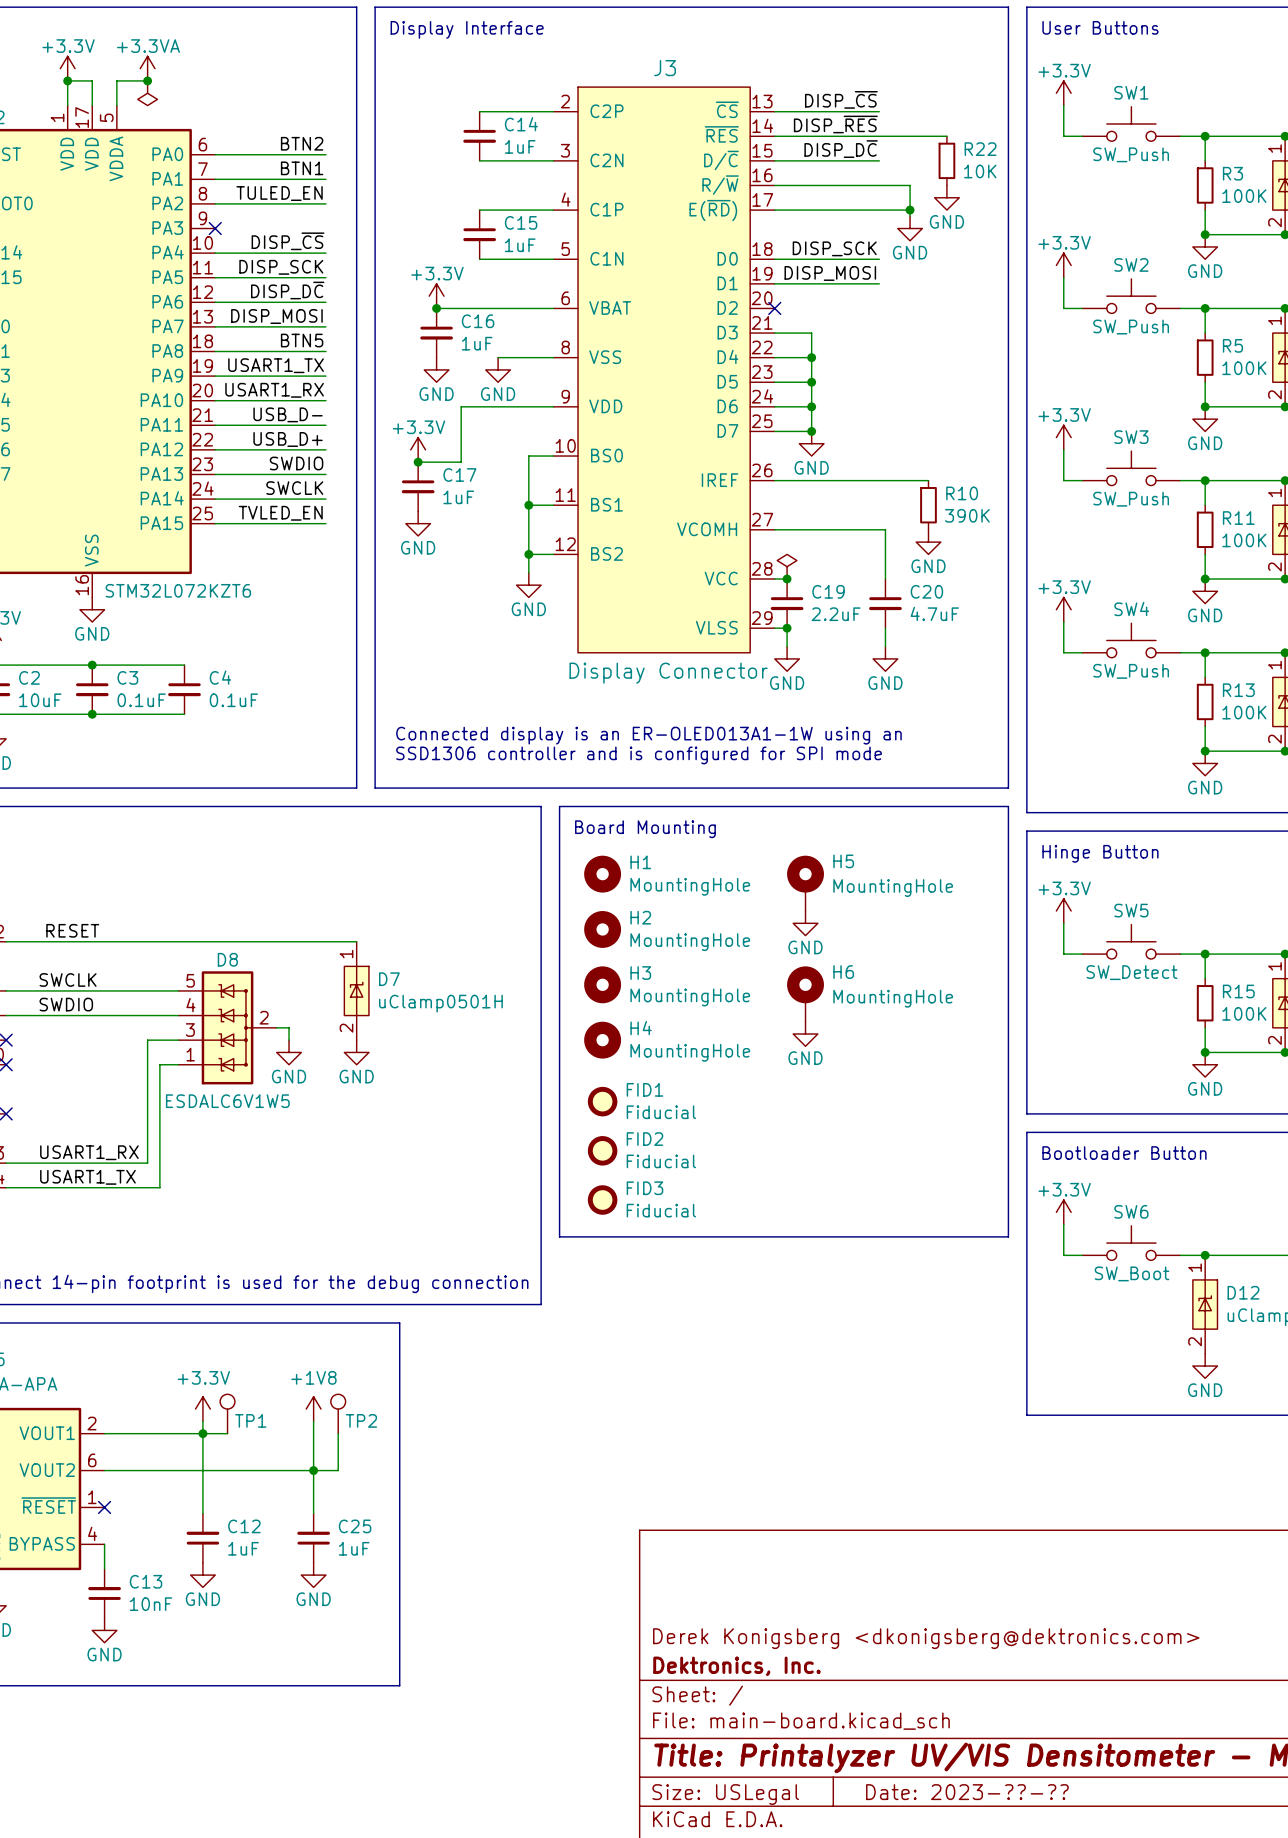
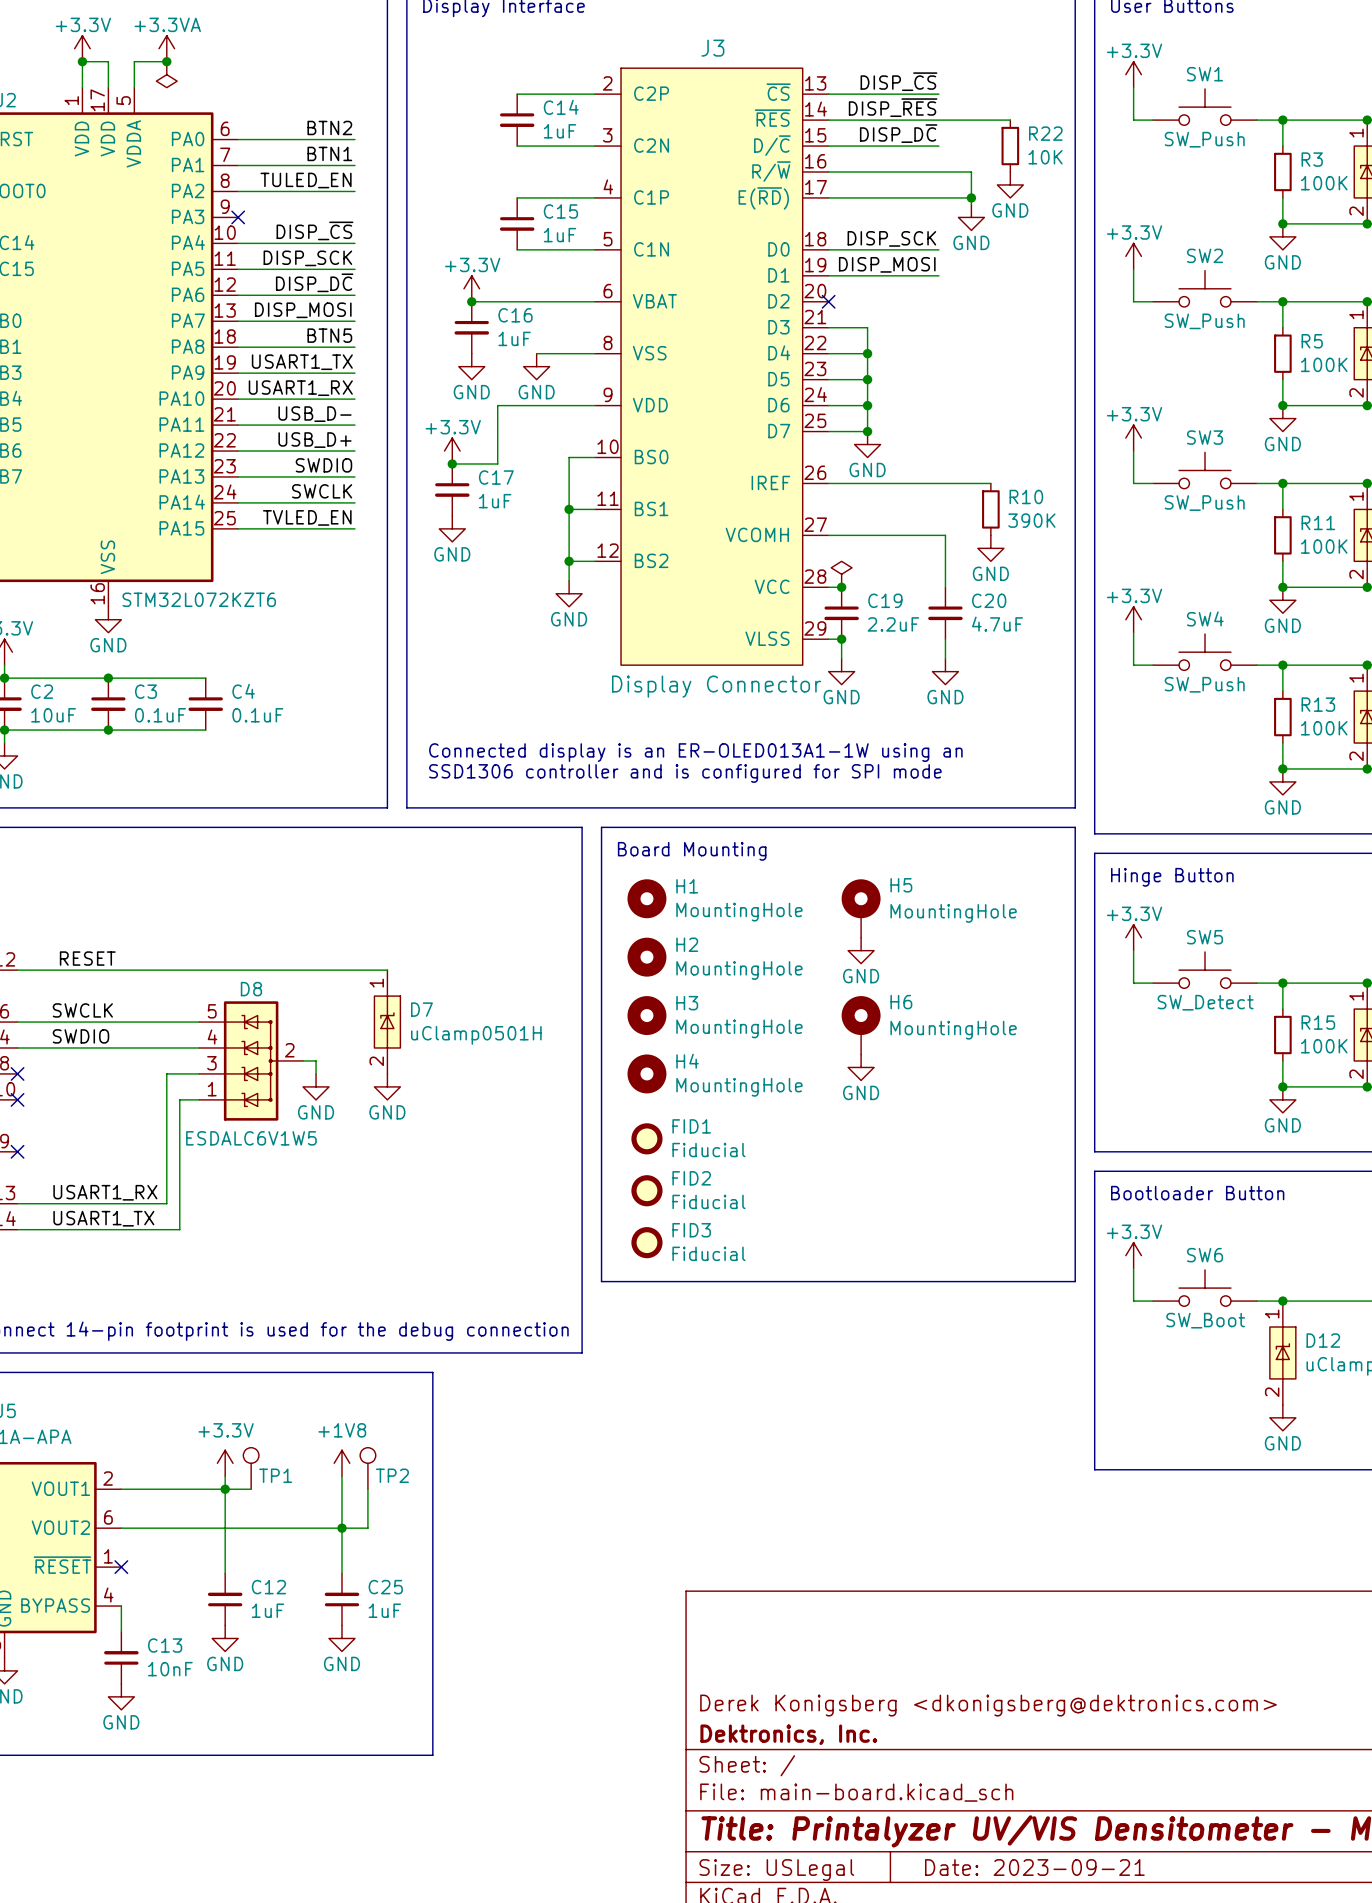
title block: Date: 2023-??-?? (967, 1792) -> Date: 2023-09-21 (1034, 1867)

